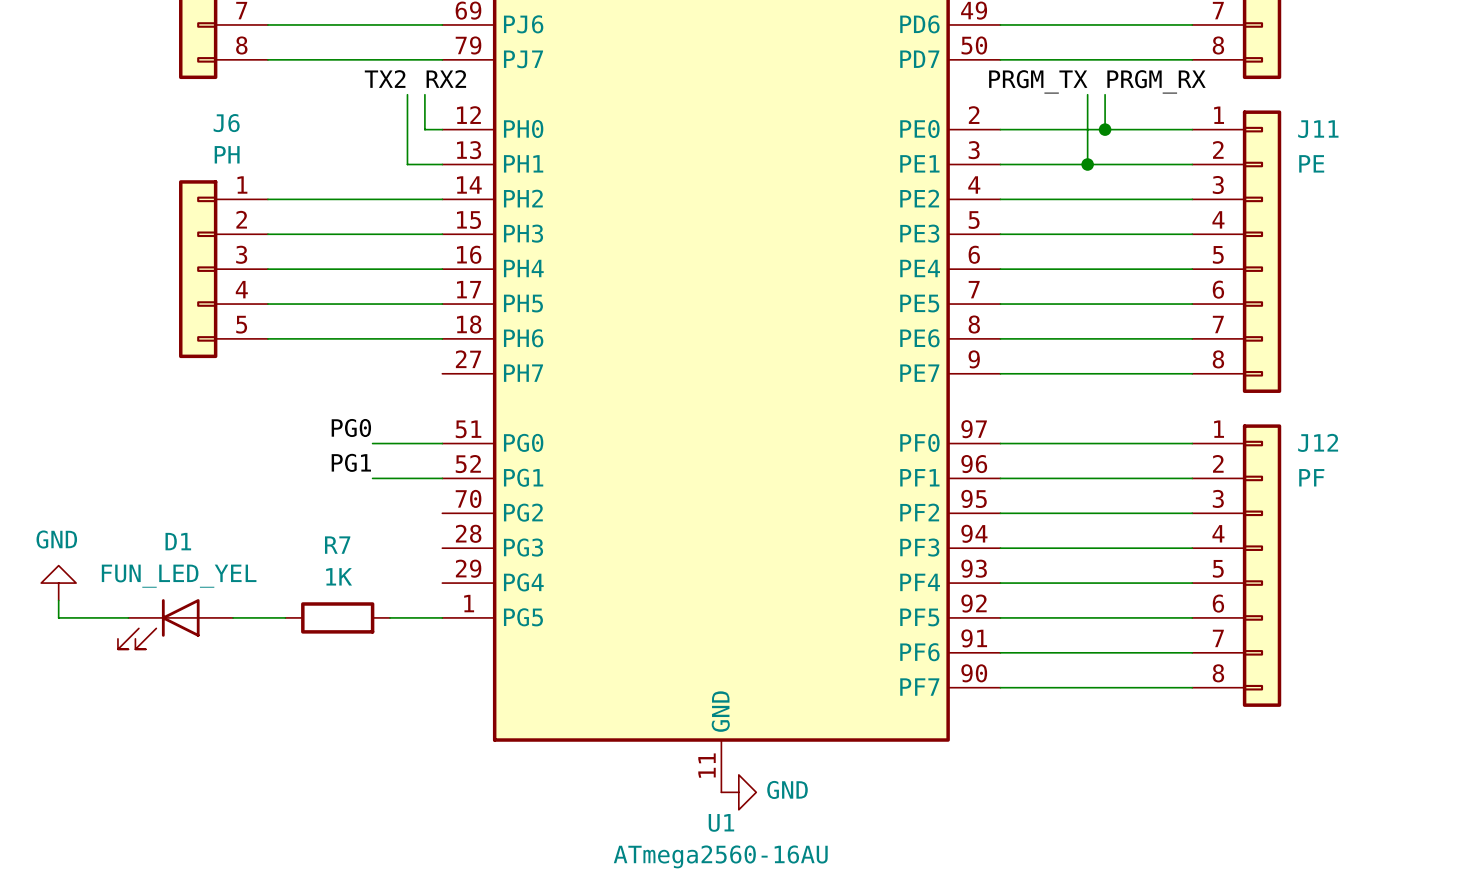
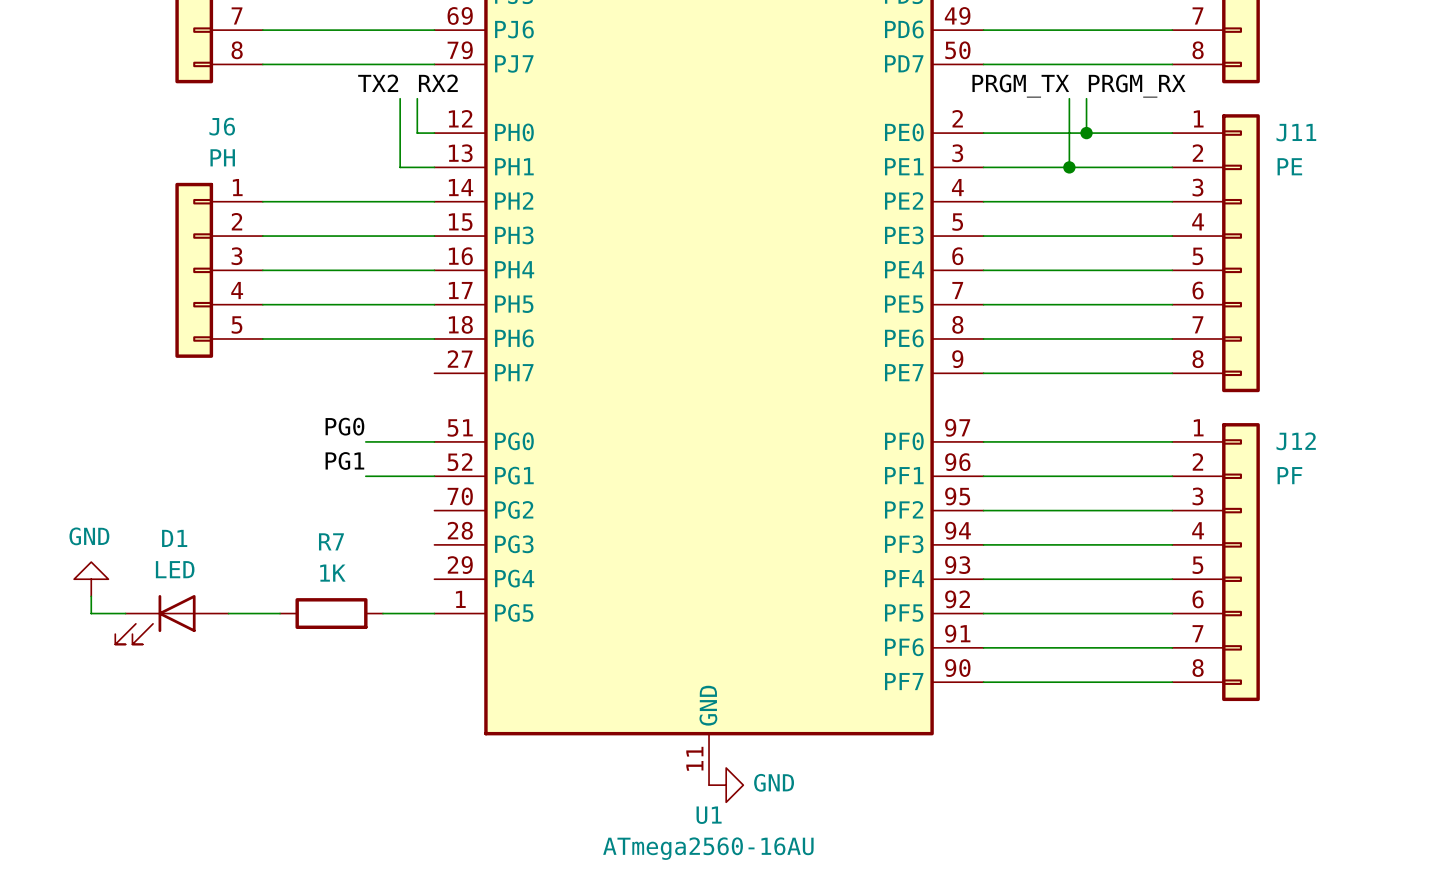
D1 value: FUN_LED_YEL (179, 576) -> LED (175, 569)
power symbol position: GND (58, 583) -> GND (91, 579)
wire: (58, 600) (58, 617) (93, 617) -> (91, 596) (91, 613)

